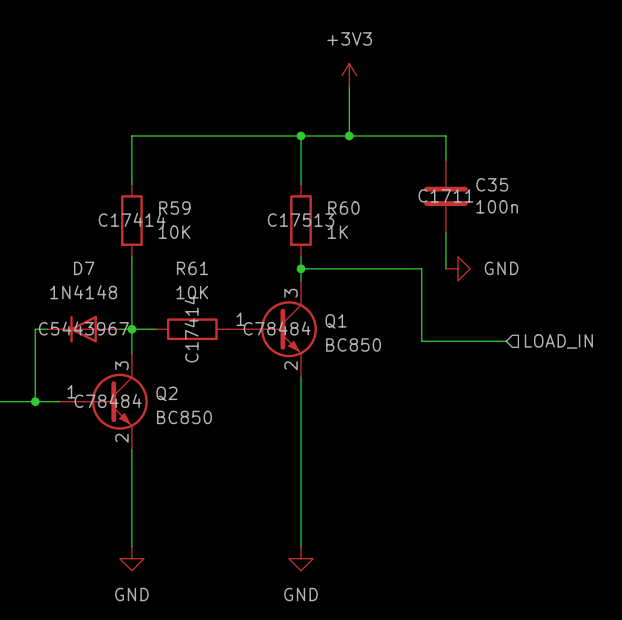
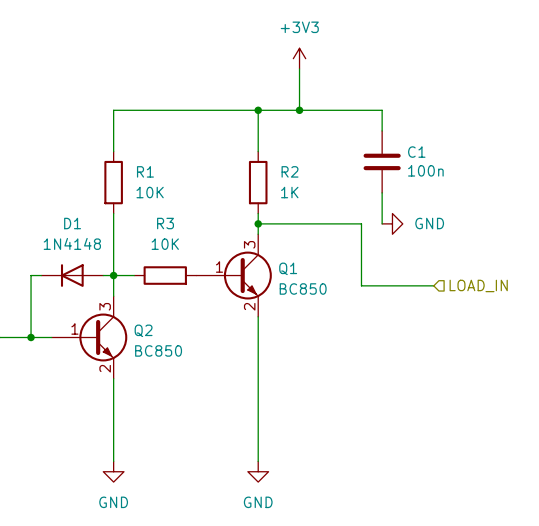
C35 name: C35 (492, 184) -> C1 (416, 152)
C35 text: C1711 (445, 195) -> none
R59 name: R59 (174, 208) -> R1 (145, 171)
R60 name: R60 (343, 208) -> R2 (290, 171)
R59 text: C17414 (132, 219) -> none
R60 text: C17513 (301, 220) -> none
D7 name: D7 (84, 268) -> D1 (72, 223)
R61 name: R61 (192, 268) -> R3 (165, 223)
Q1 symbol: [228, 280, 317, 378] -> [196, 234, 272, 317]
D7 text: C5443967 (83, 328) -> none
R61 text: C17414 (191, 328) -> none
Q1 text: C78484 (277, 328) -> none
Q2 symbol: [59, 353, 148, 451] -> [51, 296, 128, 379]
Q2 text: C78484 (108, 400) -> none

